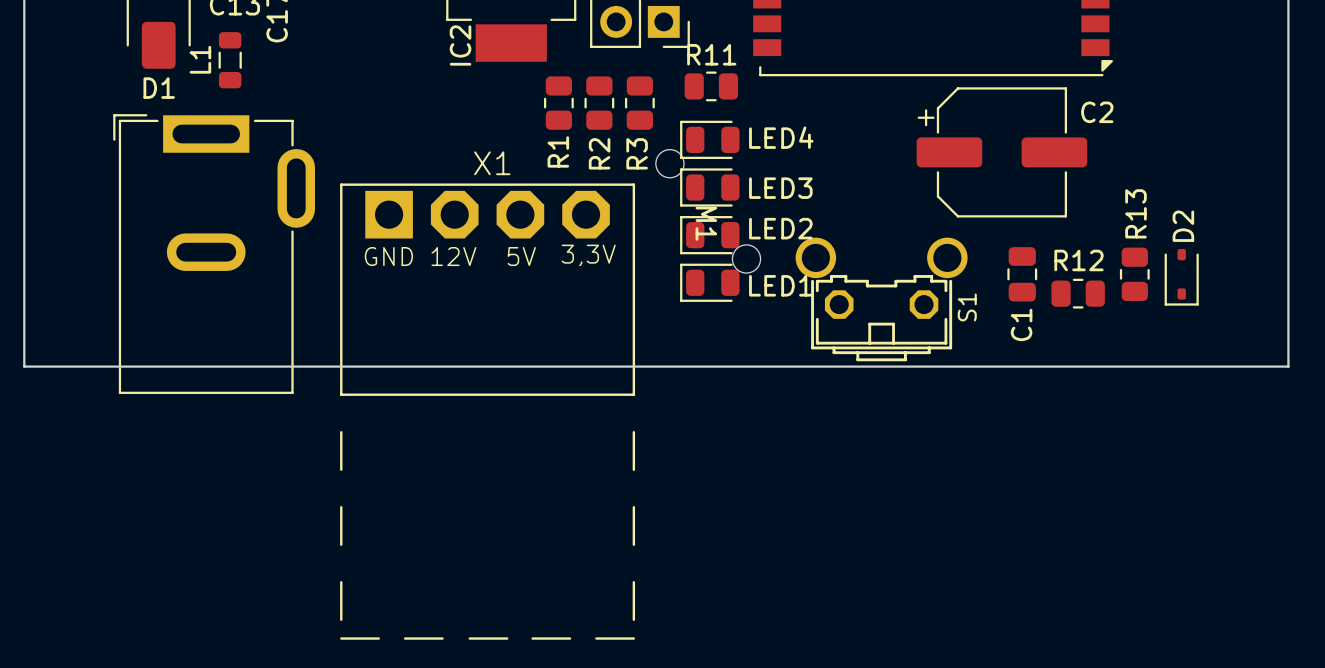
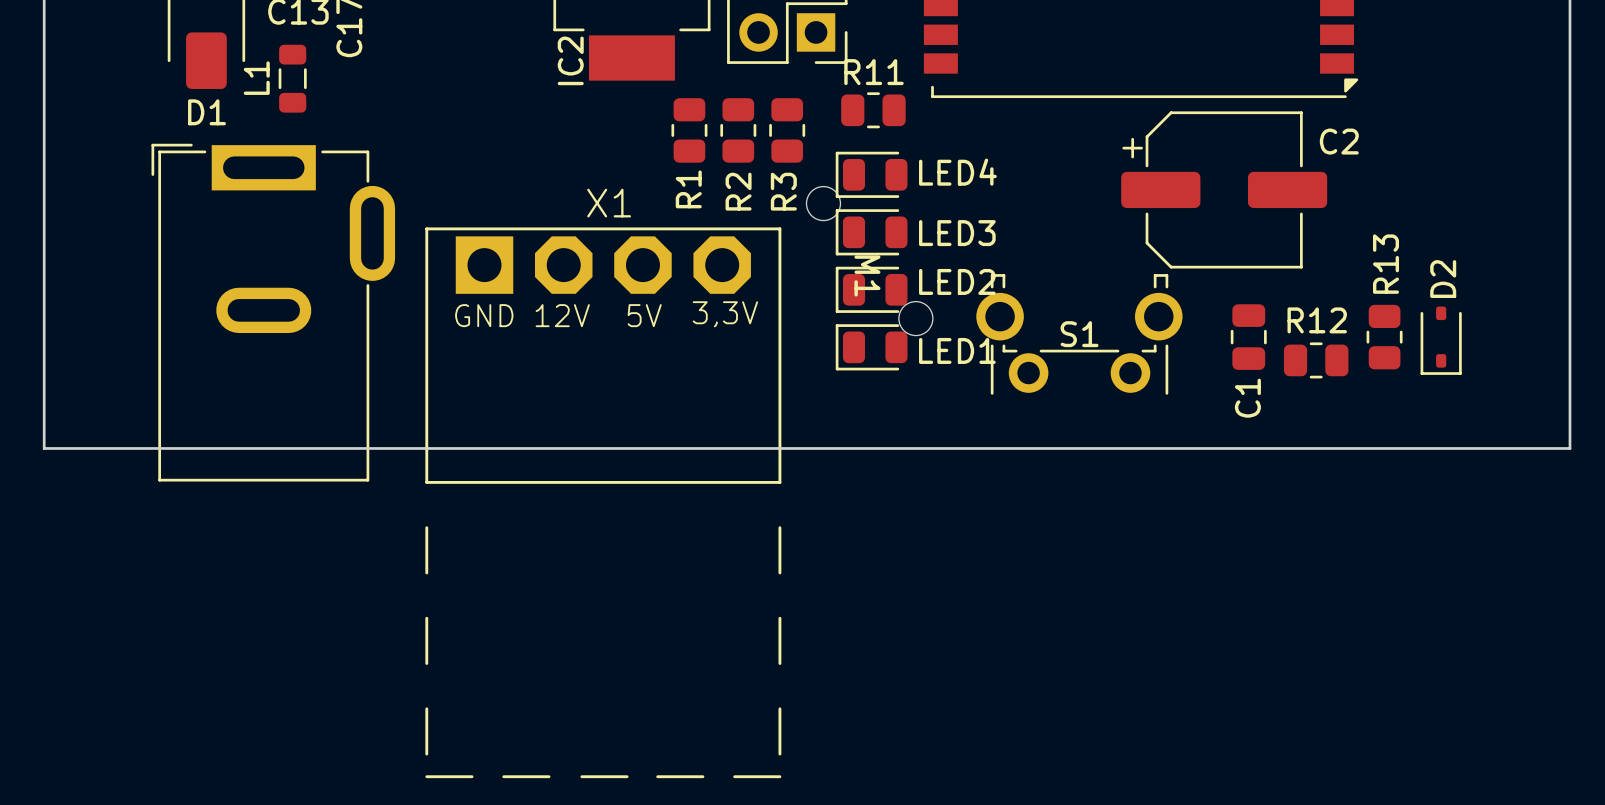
S1 footprint: [795, 237, 968, 362] -> [976, 274, 1183, 395]
S1 name position: S1 (967, 307) -> S1 (1079, 334)

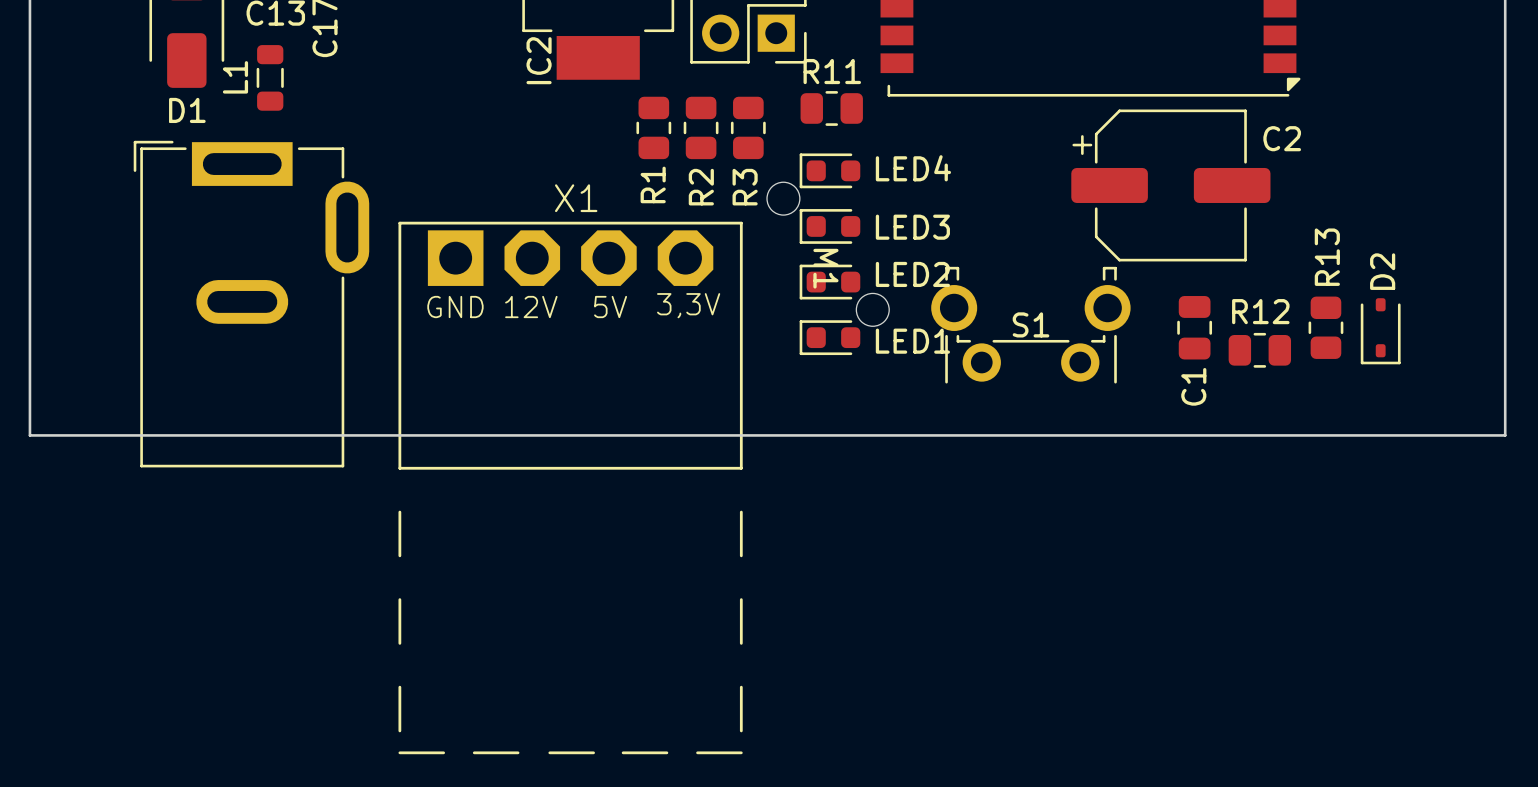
LED4 footprint: [835, 151, 908, 198] -> [799, 153, 861, 189]
LED3 footprint: [835, 209, 908, 256] -> [799, 209, 861, 244]
LED2 footprint: [835, 266, 908, 313] -> [799, 264, 861, 300]
LED1 footprint: [835, 324, 908, 371] -> [799, 320, 861, 356]

